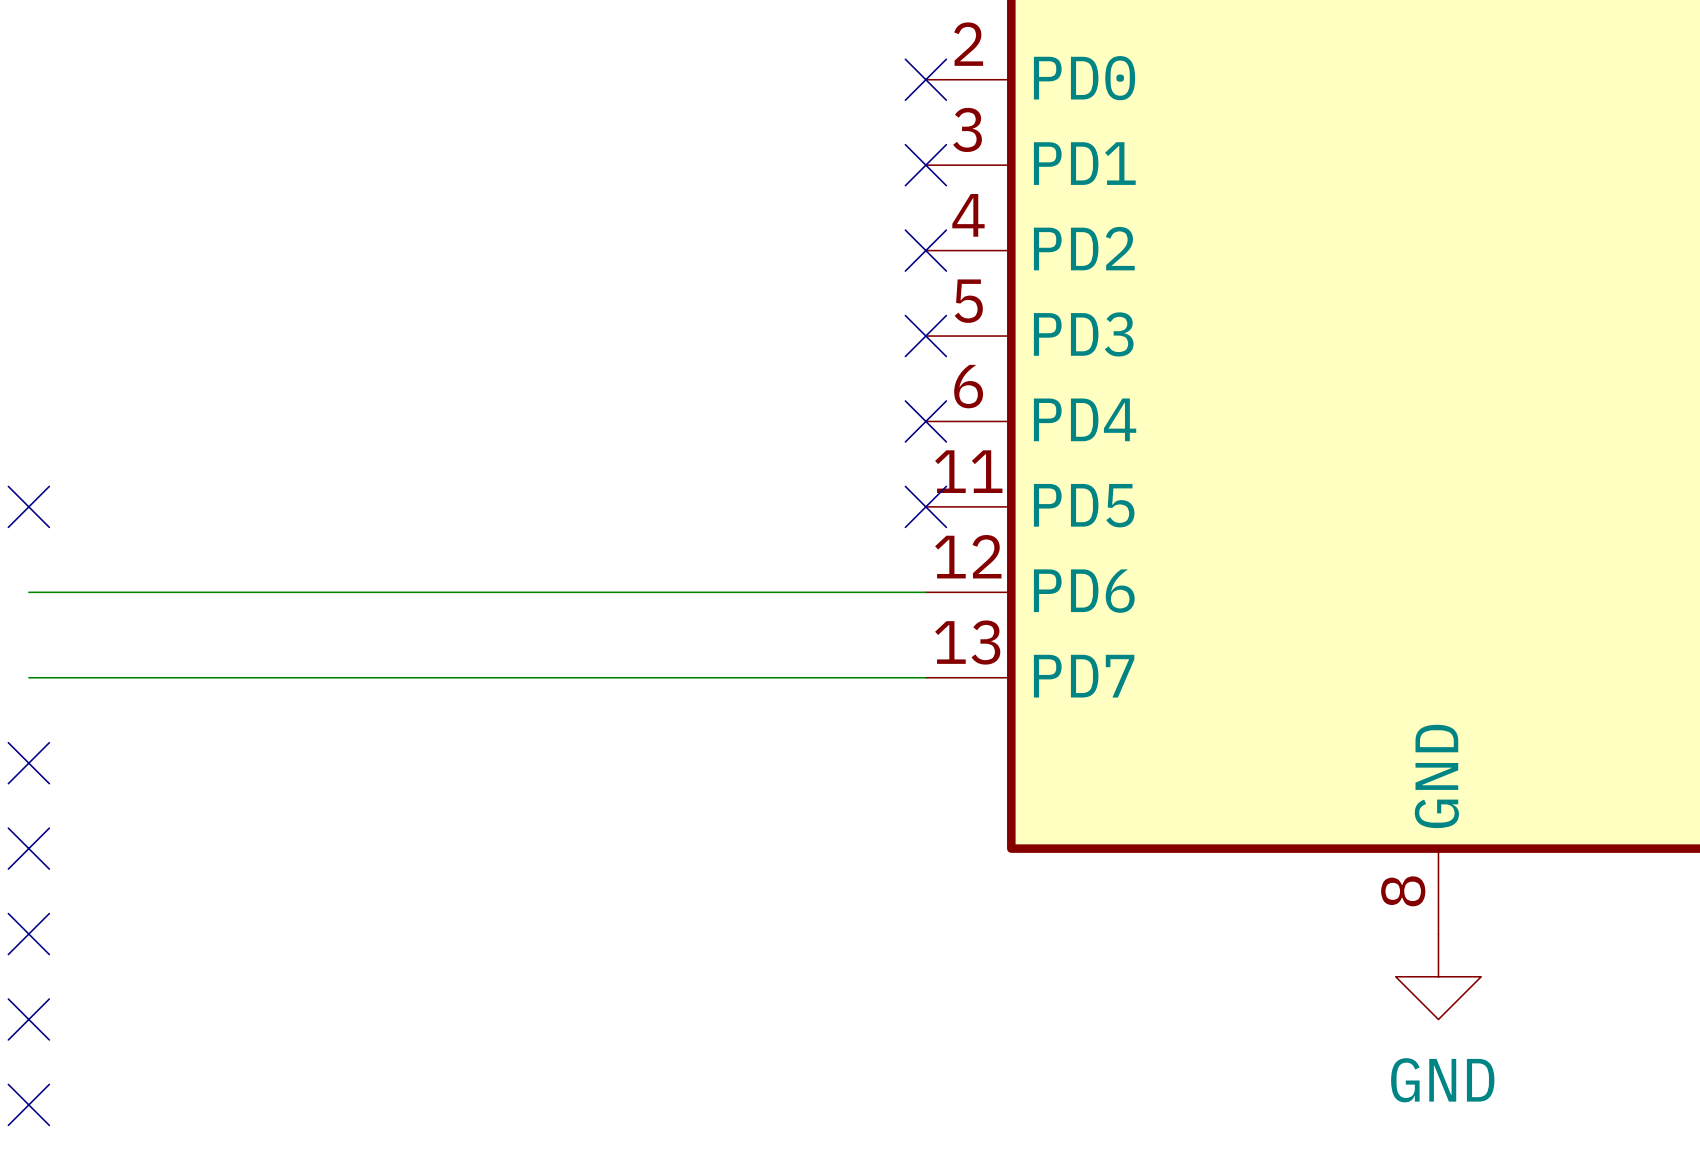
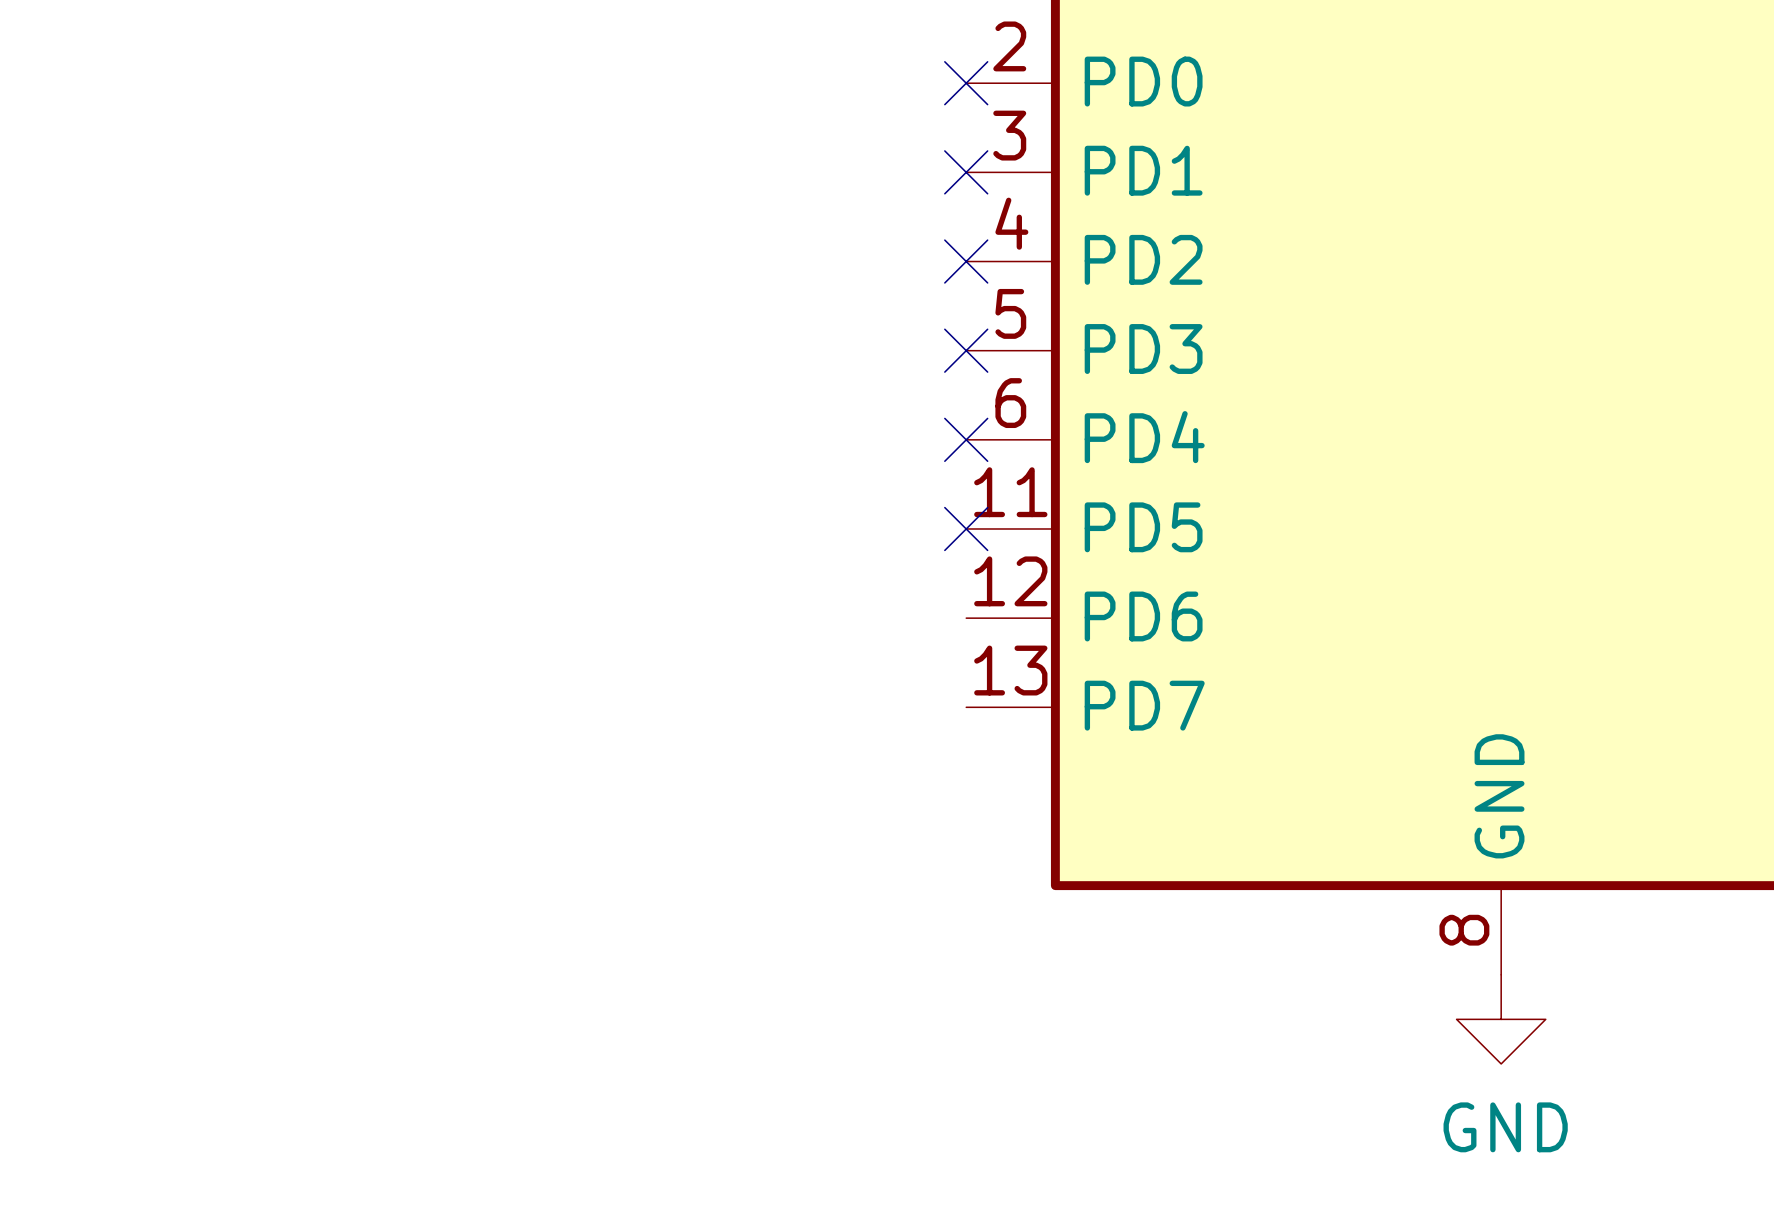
no-connect mark: (28, 506) -> none
wire: (28, 592) (925, 592) -> none
wire: (28, 677) (925, 677) -> none
no-connect mark: (28, 763) -> none
no-connect mark: (28, 848) -> none
no-connect mark: (28, 934) -> none
no-connect mark: (28, 1019) -> none
no-connect mark: (28, 1104) -> none

